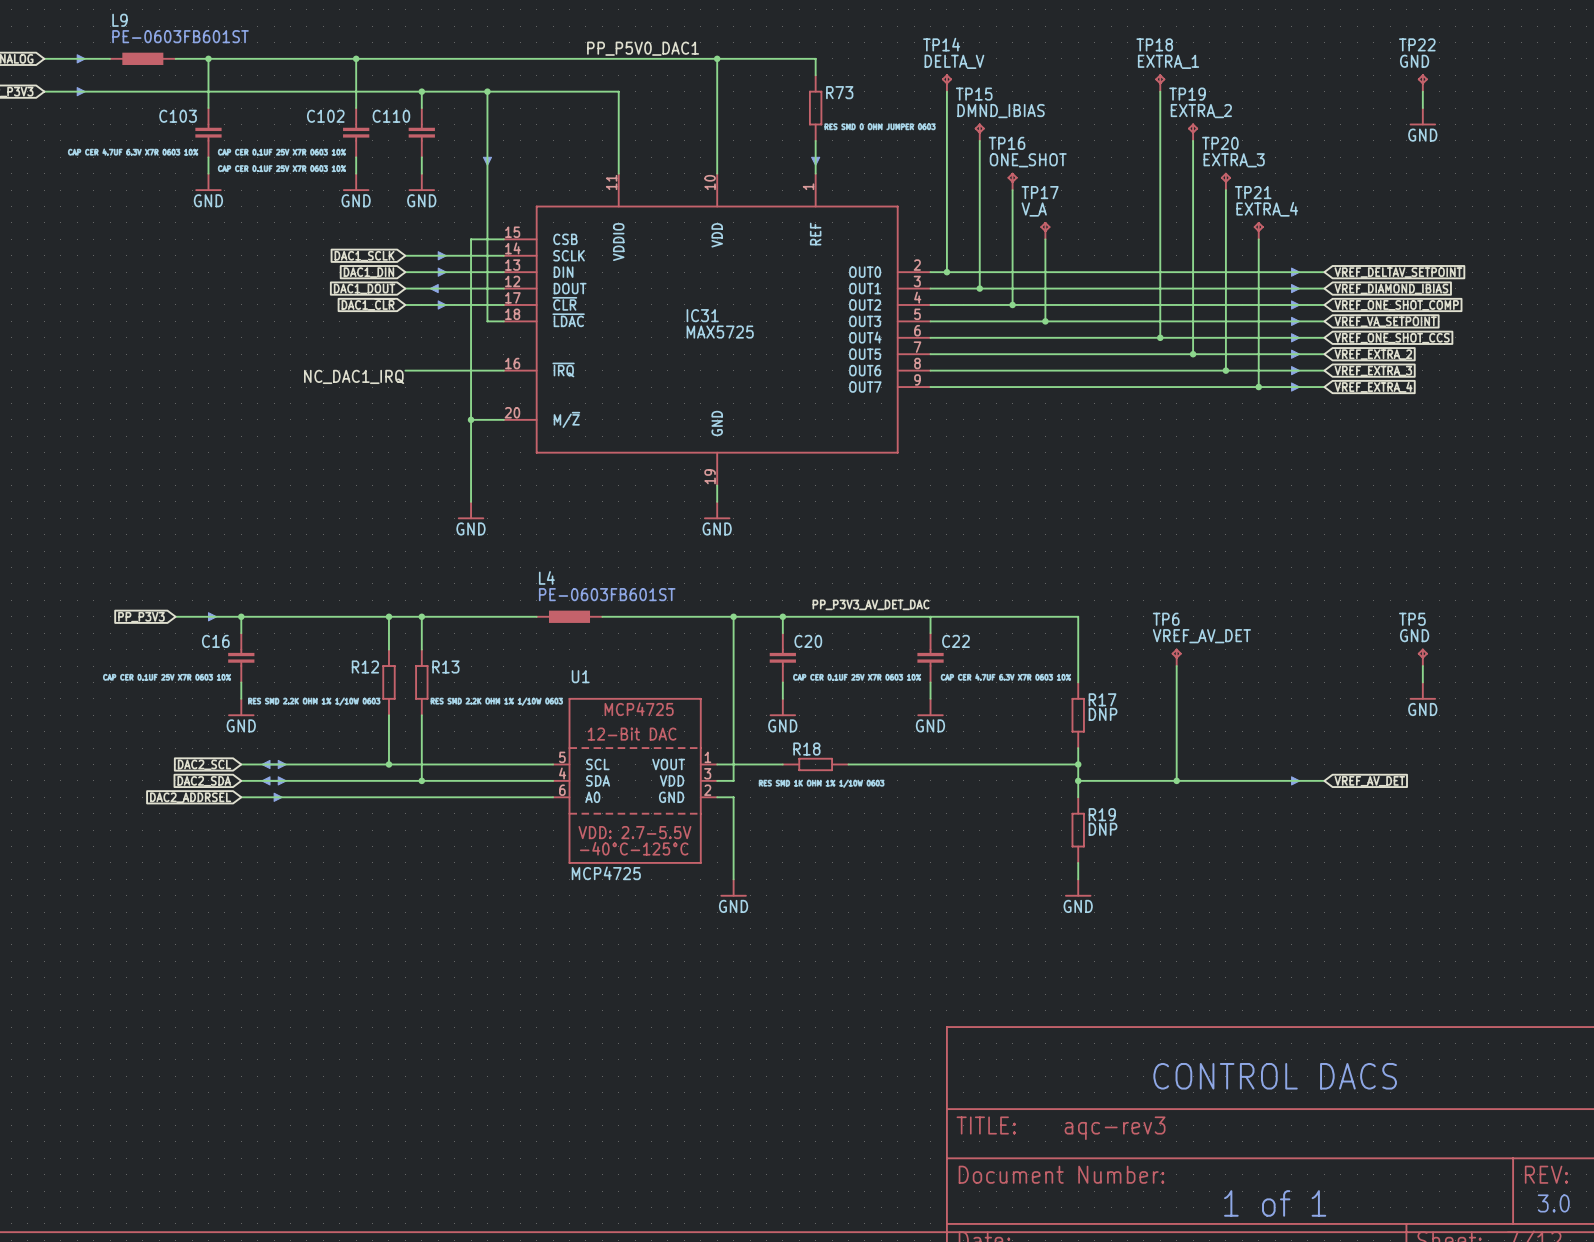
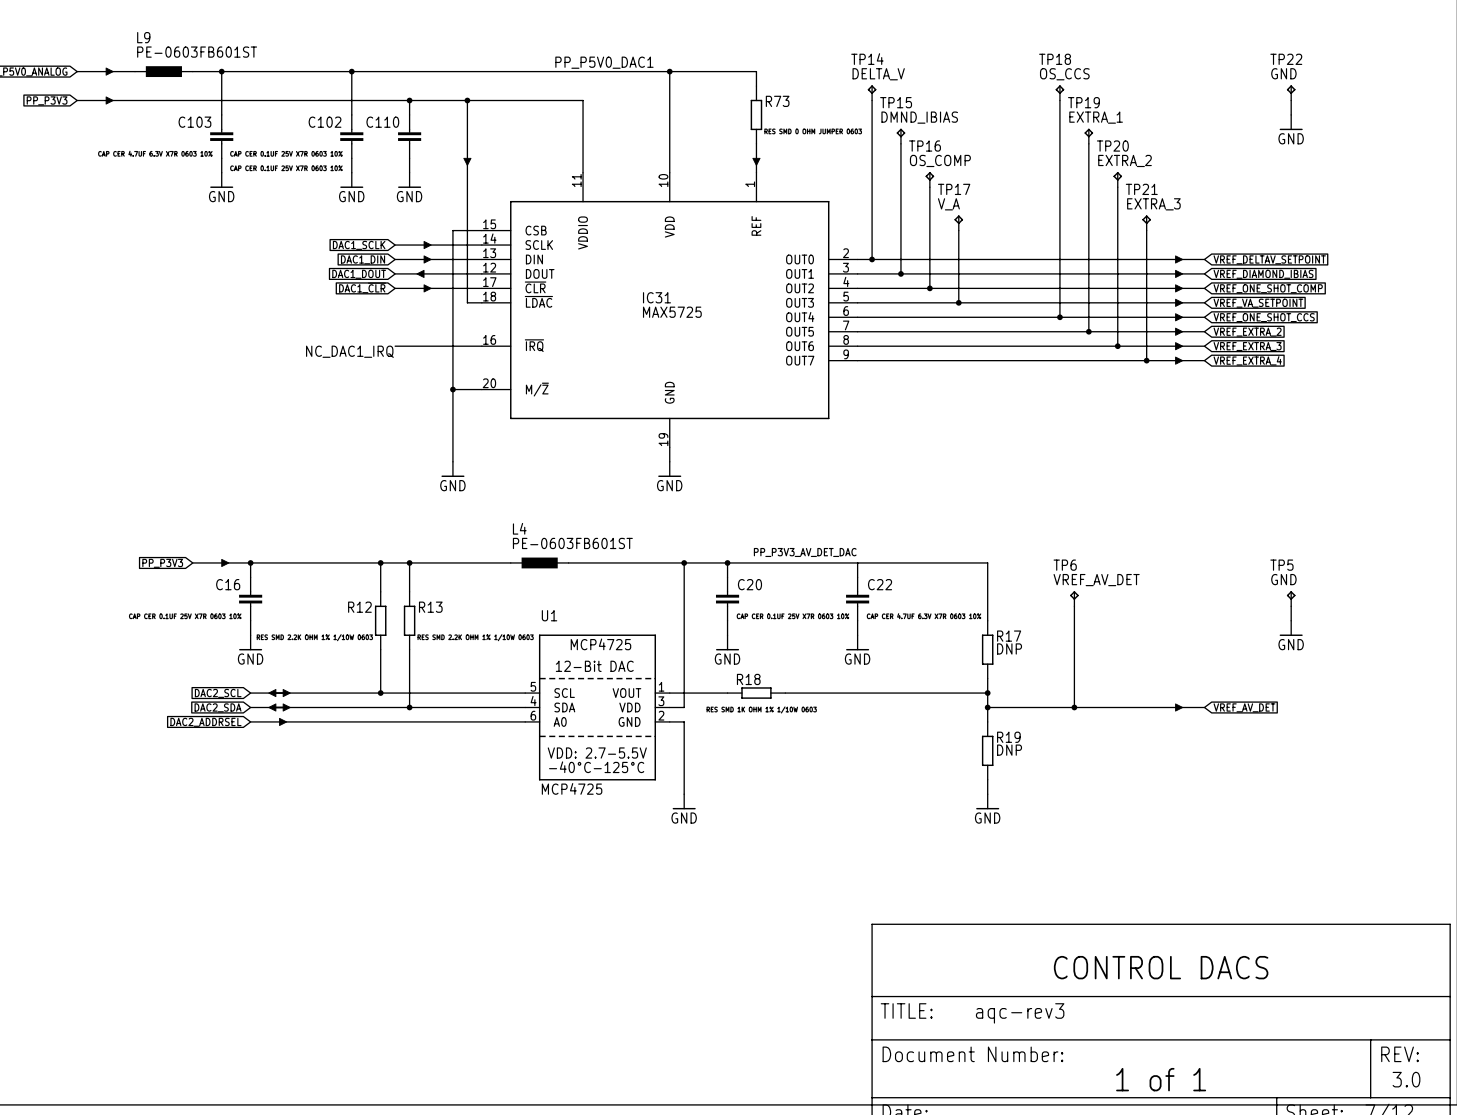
TP18 value: EXTRA_1 (1168, 61) -> OS_CCS (1064, 74)
TP19 value: EXTRA_2 (1201, 111) -> EXTRA_1 (1096, 117)
TP16 value: ONE_SHOT (1028, 160) -> OS_COMP (940, 160)
TP20 value: EXTRA_3 (1234, 160) -> EXTRA_2 (1125, 160)
TP21 value: EXTRA_4 (1267, 209) -> EXTRA_3 (1153, 204)

